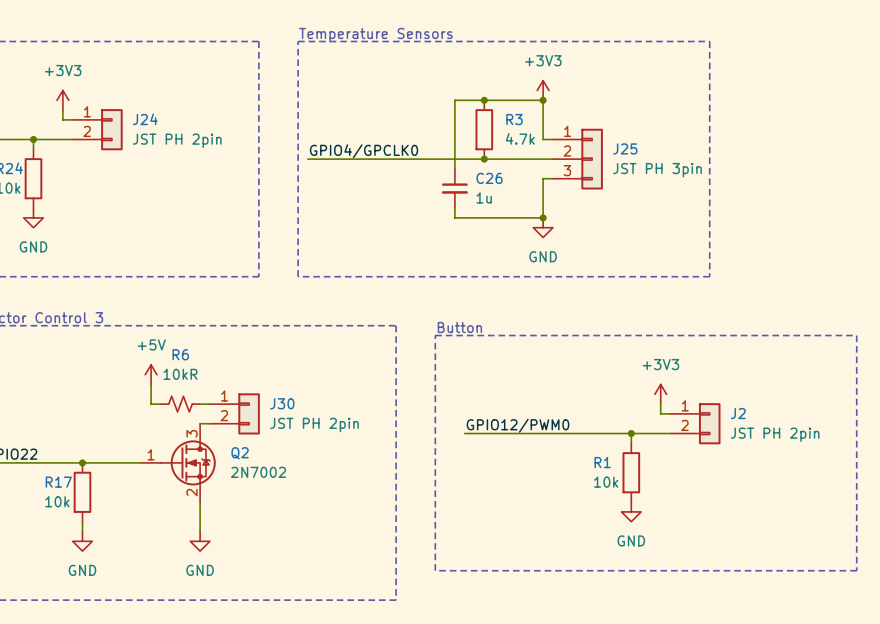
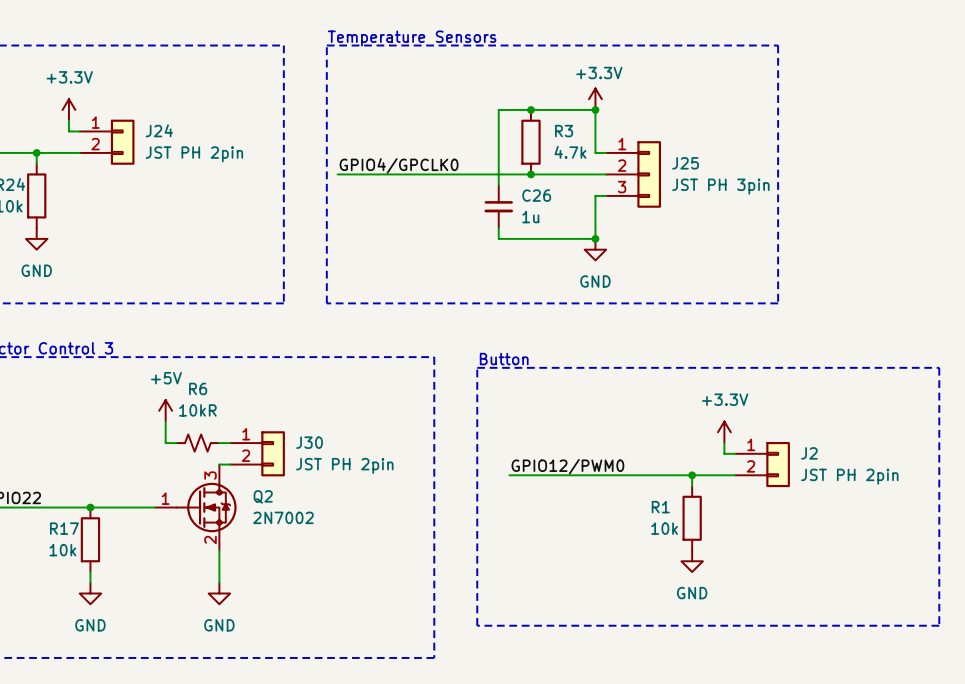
power symbol: +3V3 (543, 90) -> +3.3V (595, 99)
power symbol: +3V3 (62, 100) -> +3.3V (68, 109)
power symbol: +3V3 (660, 394) -> +3.3V (724, 432)

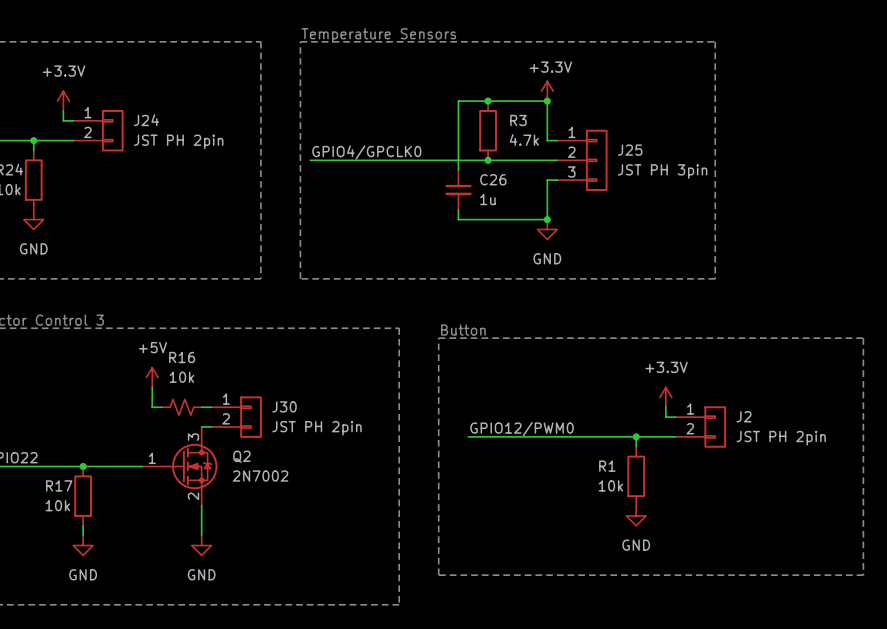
R6 name: R6 (198, 388) -> R16 (182, 357)
R6 value: 10kR (197, 410) -> 10k (181, 377)

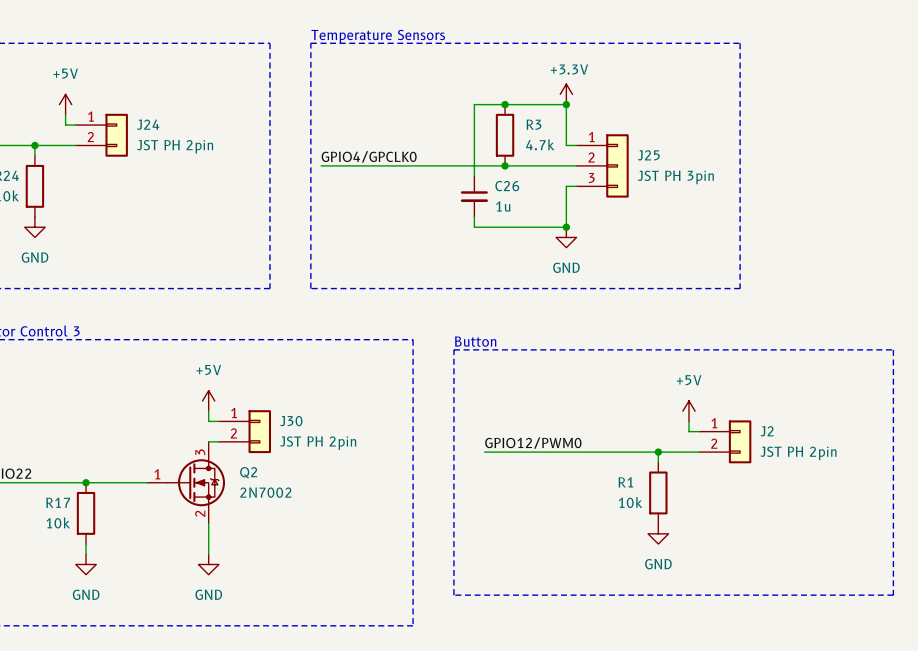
power symbol: +3.3V (63, 101) -> +5V (65, 104)
power symbol position: +5V (152, 377) -> +5V (208, 400)
wire: (152, 387) (152, 407) (162, 407) -> none
wire: none -> (208, 411) (208, 421)
power symbol: +3.3V (665, 397) -> +5V (688, 411)
R16: 10k (181, 407) -> none

